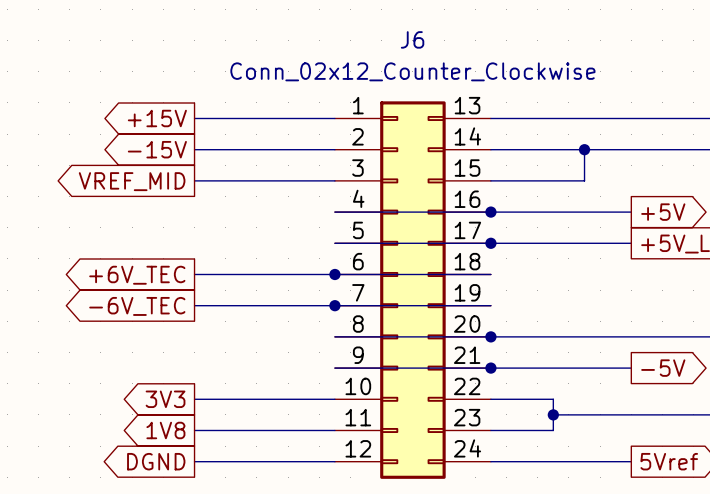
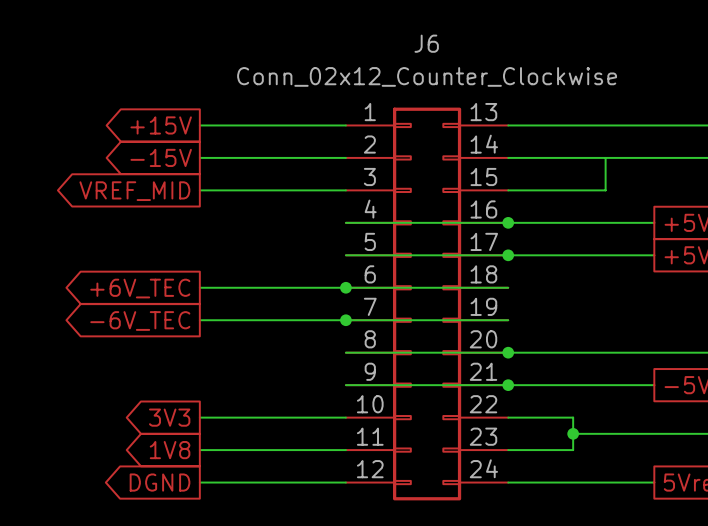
junction: (584, 149) -> none

